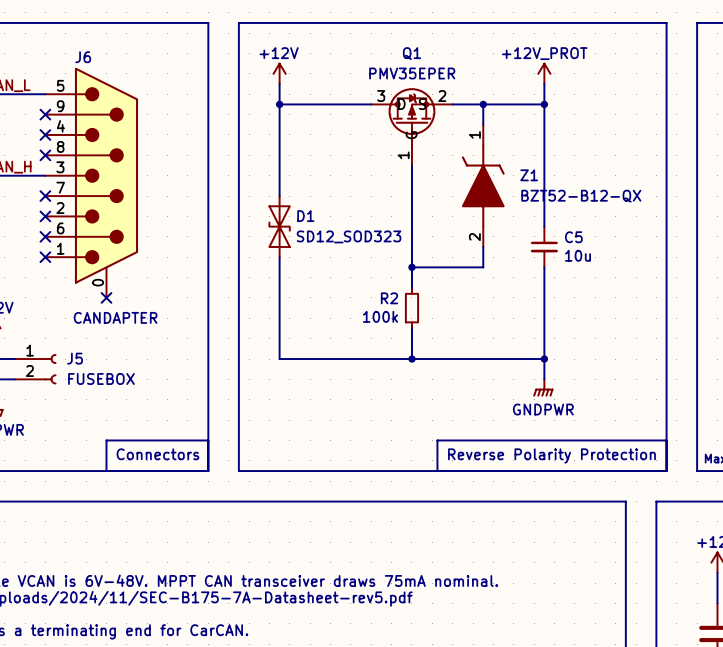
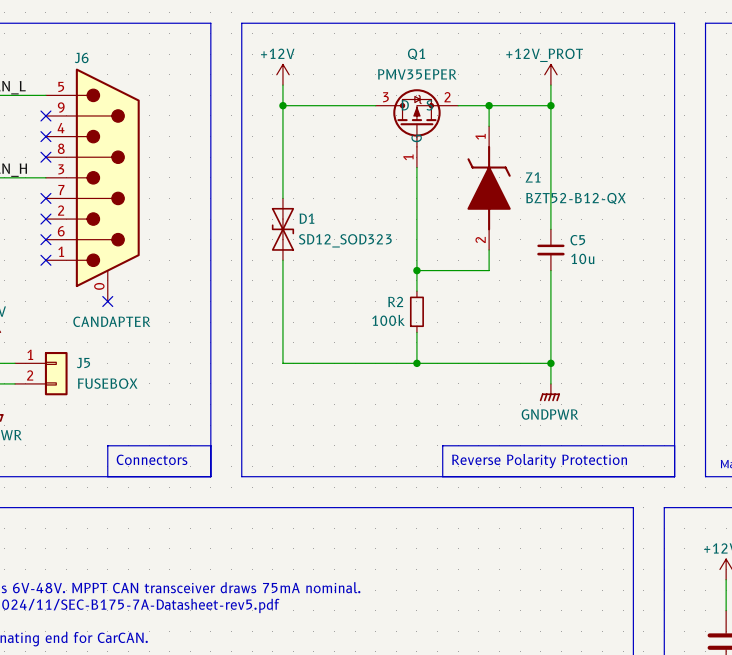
J5 symbol: [14, 354, 57, 385] -> [15, 352, 68, 396]

